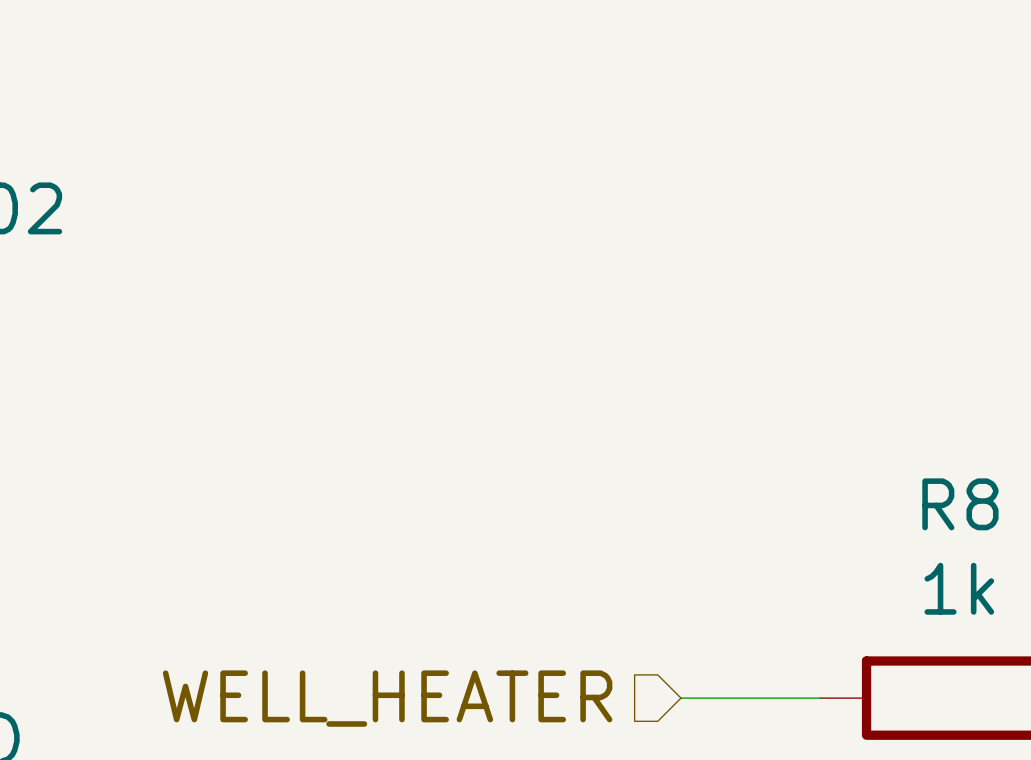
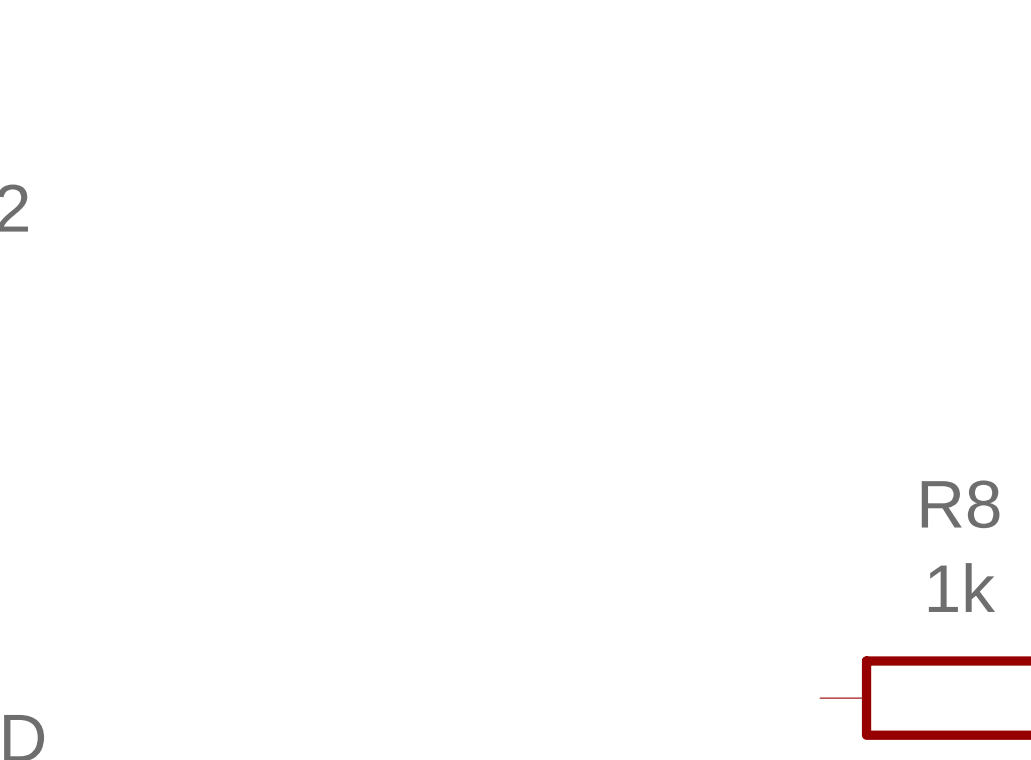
hierarchical label: WELL_HEATER (387, 698) -> none
wire: (681, 698) (820, 698) -> none

